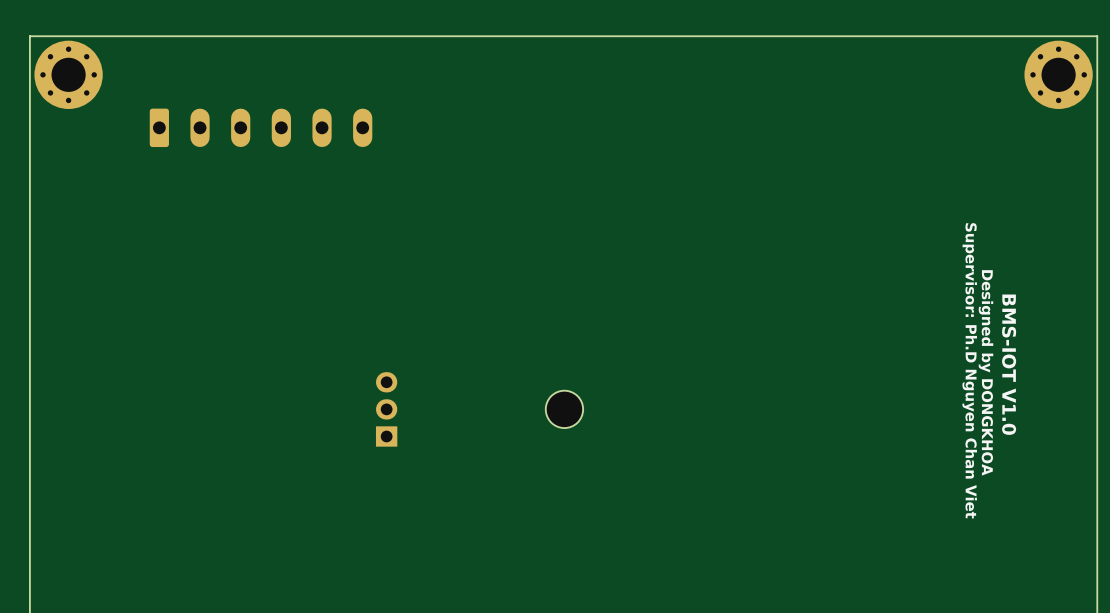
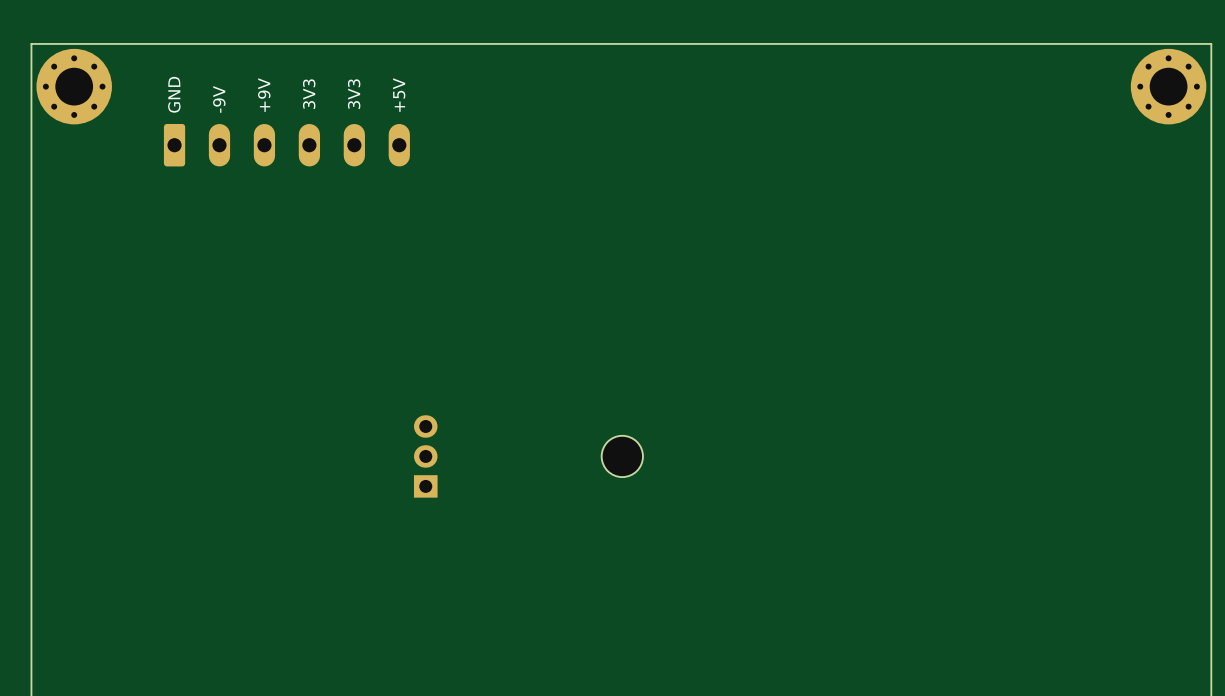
text: none -> 3V3 (309, 94)
text: none -> 3V3 (354, 94)
text: none -> GND (174, 94)
text: none -> +9V (264, 95)
text: none -> +5V (399, 95)
text: none -> -9V (219, 99)
text: BMS-IOT V1.0 (1009, 364) -> none
text: Supervisor: Ph.D Nguyen Chan Viet (969, 370) -> none
text: Designed by DONGKHOA (985, 372) -> none

